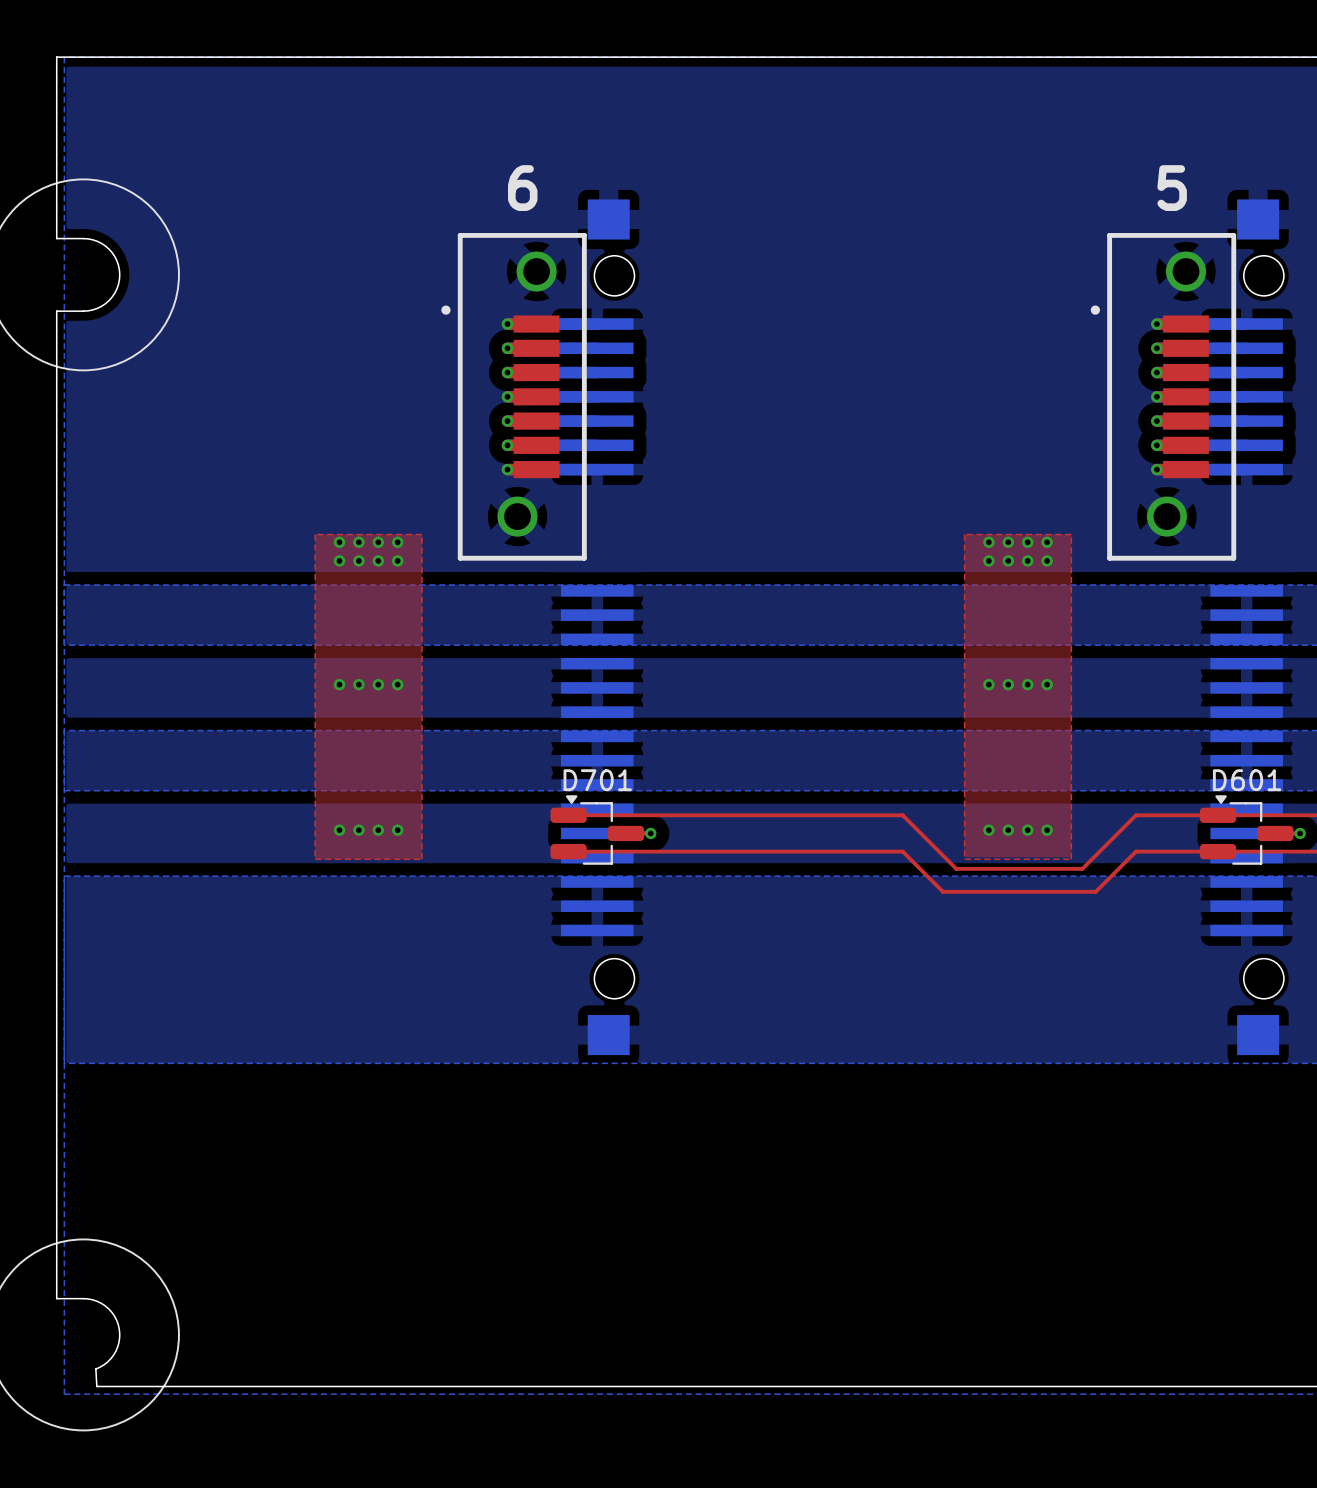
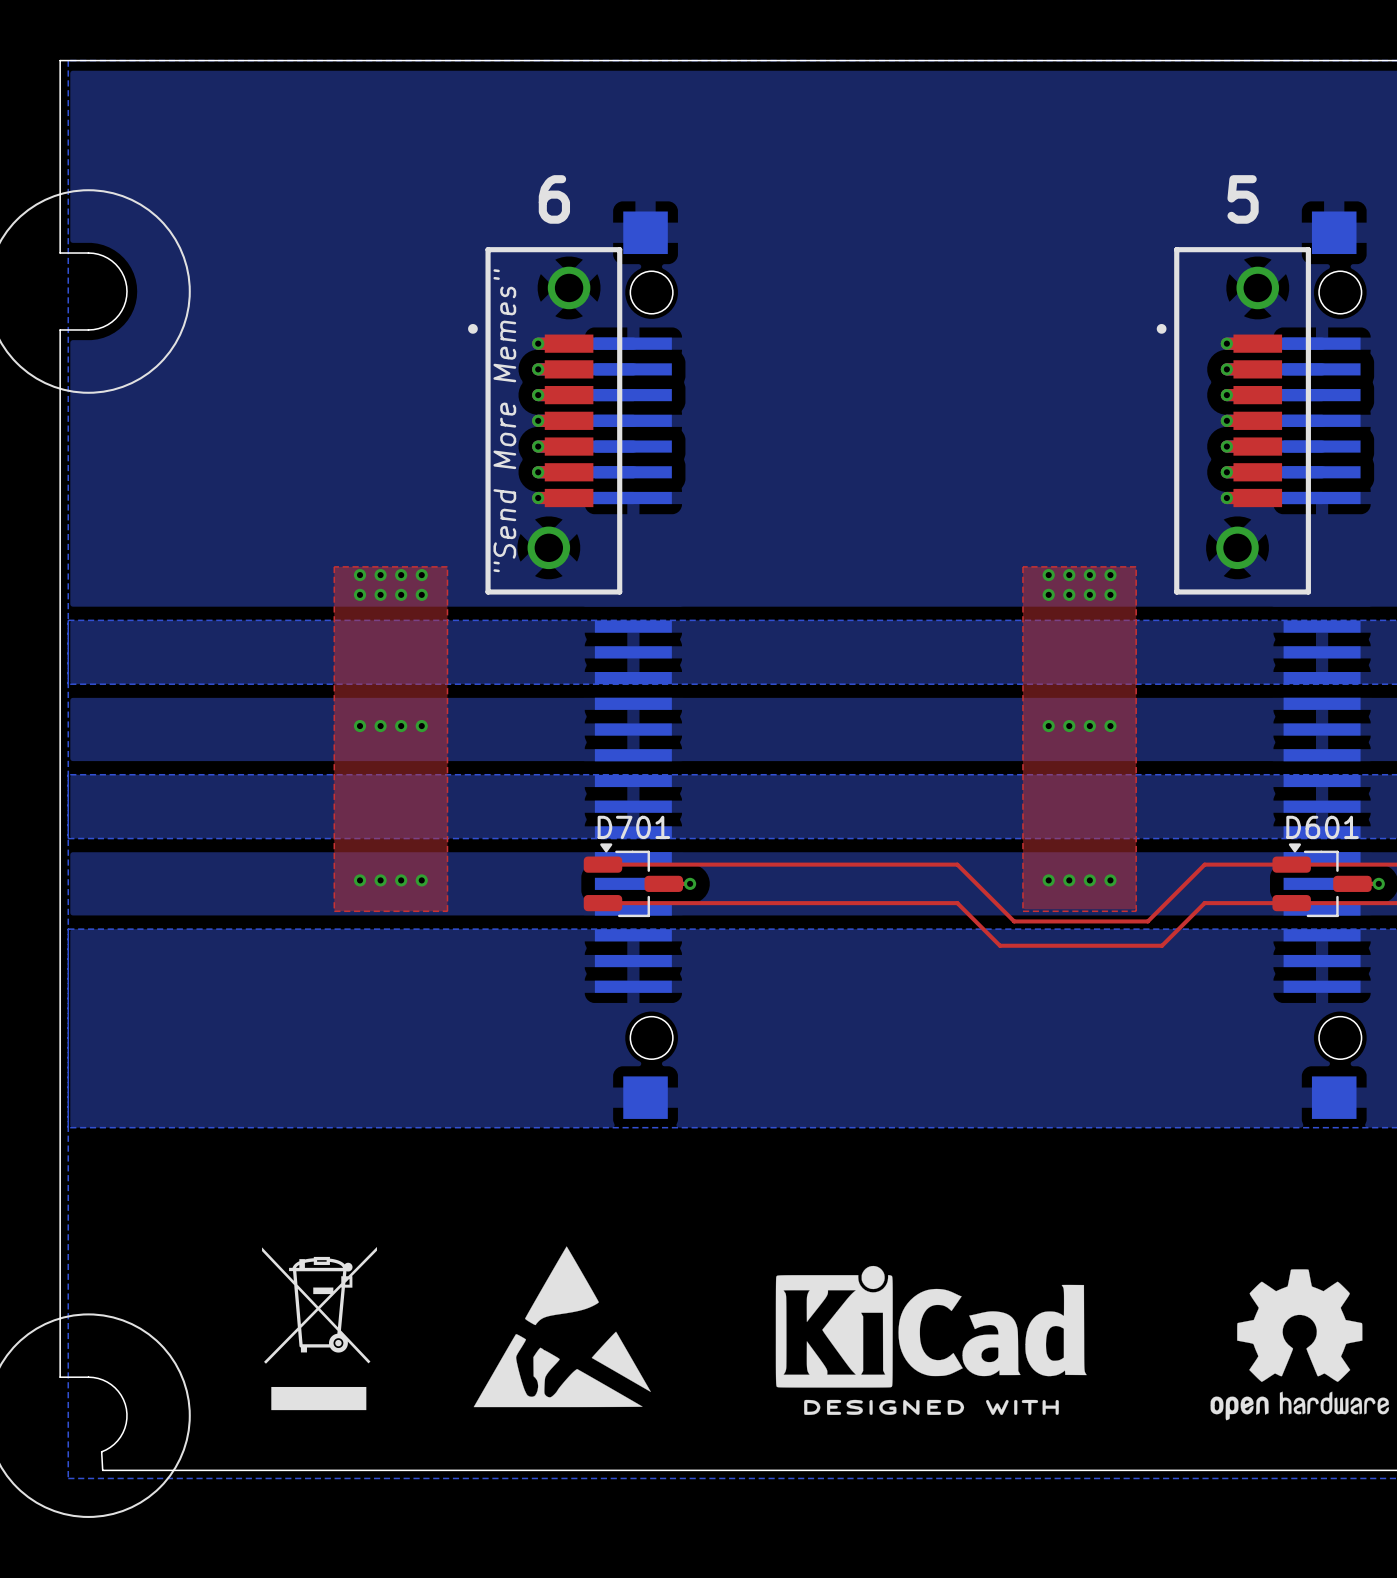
text: none -> "Send More Memes" (504, 420)
drawing: none -> [262, 1246, 377, 1411]
drawing: none -> [473, 1246, 651, 1408]
drawing: none -> [775, 1265, 1087, 1415]
drawing: none -> [1210, 1269, 1389, 1421]

